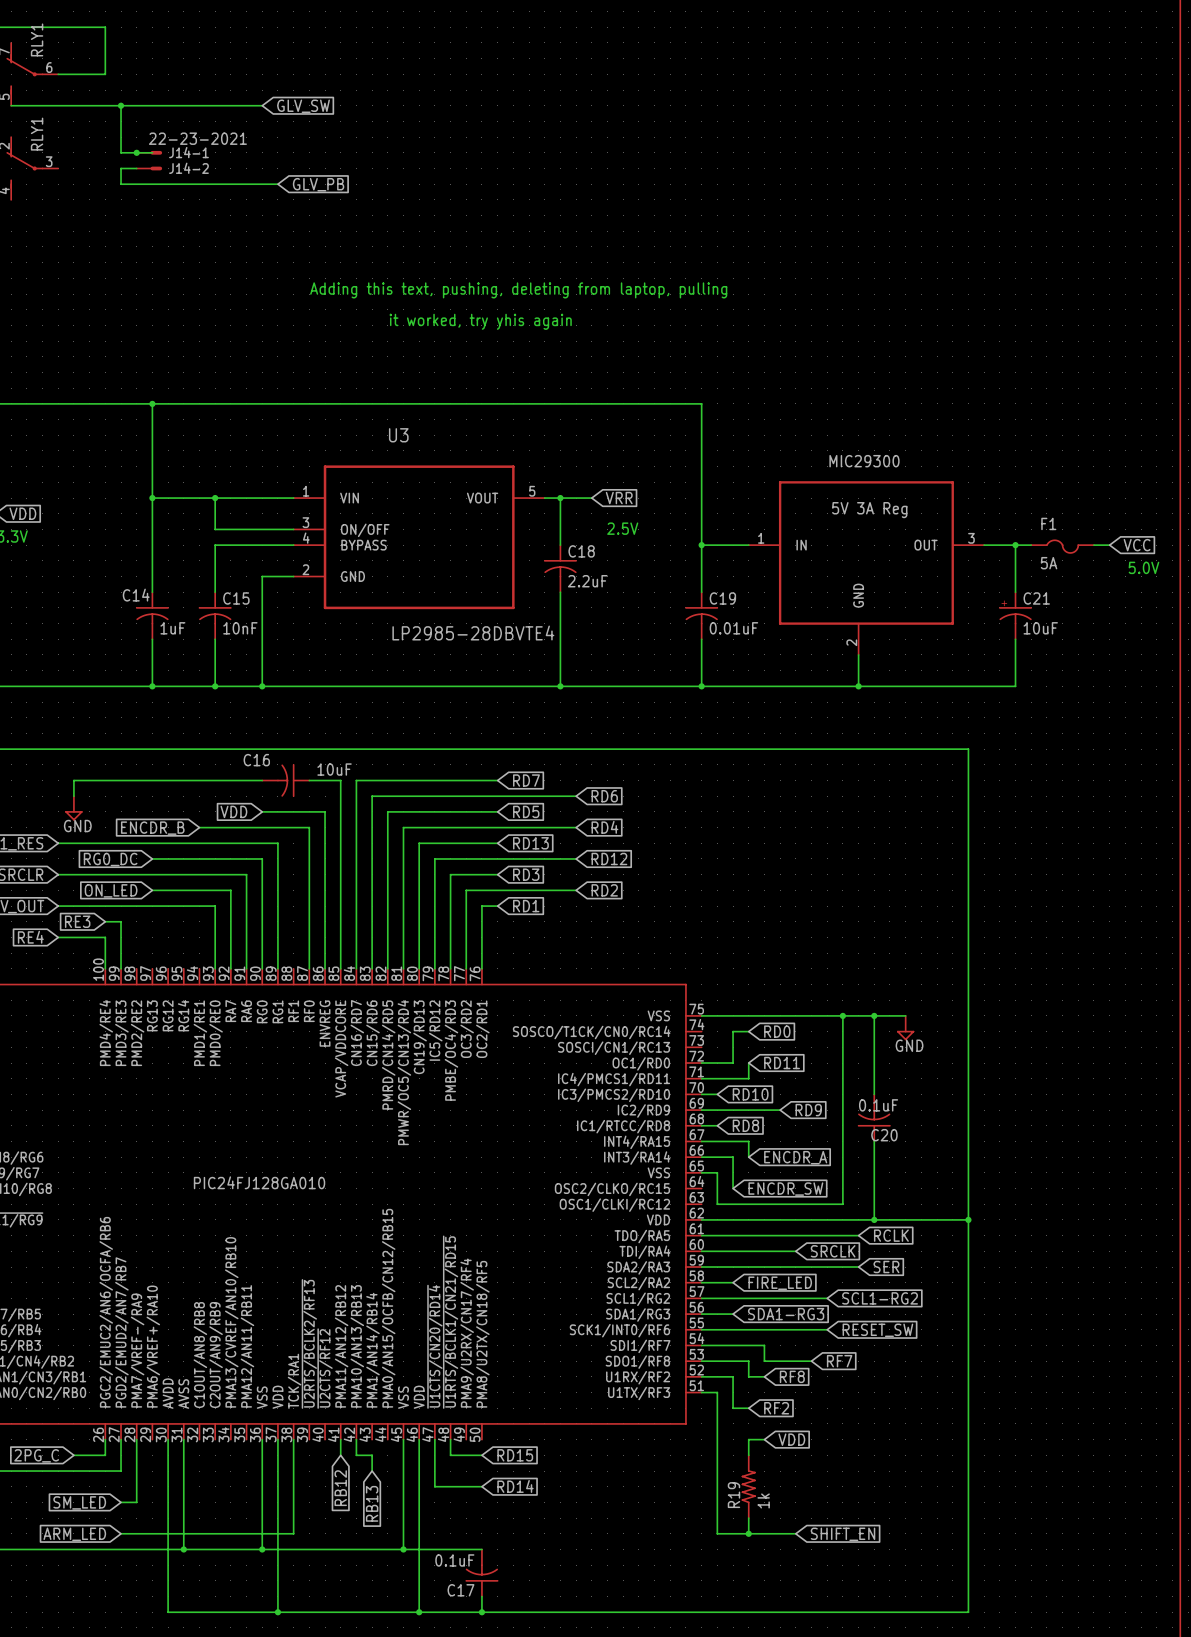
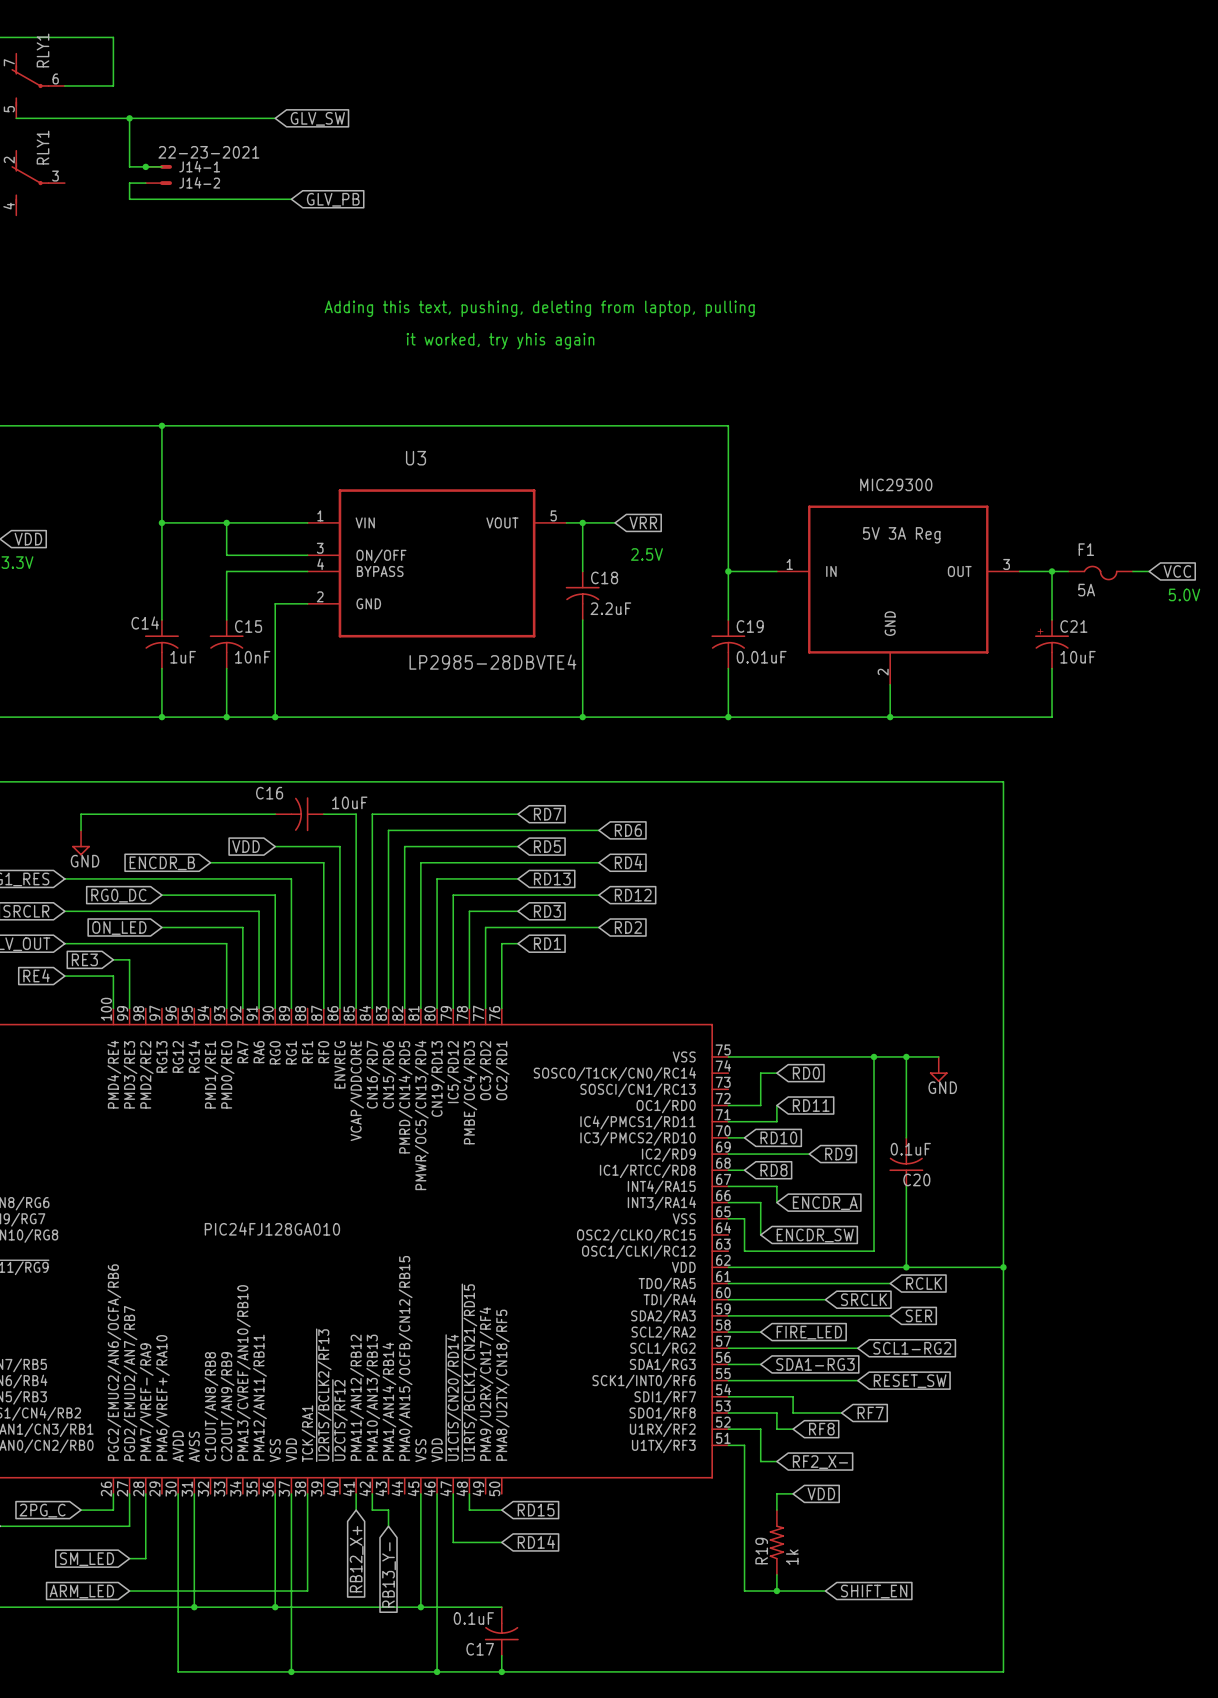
global label: RF2 (776, 1408) -> RF2_X- (820, 1462)
global label: RB12 (340, 1488) -> RB12_X+ (356, 1559)
global label: RB13 (372, 1503) -> RB13_Y- (389, 1574)

